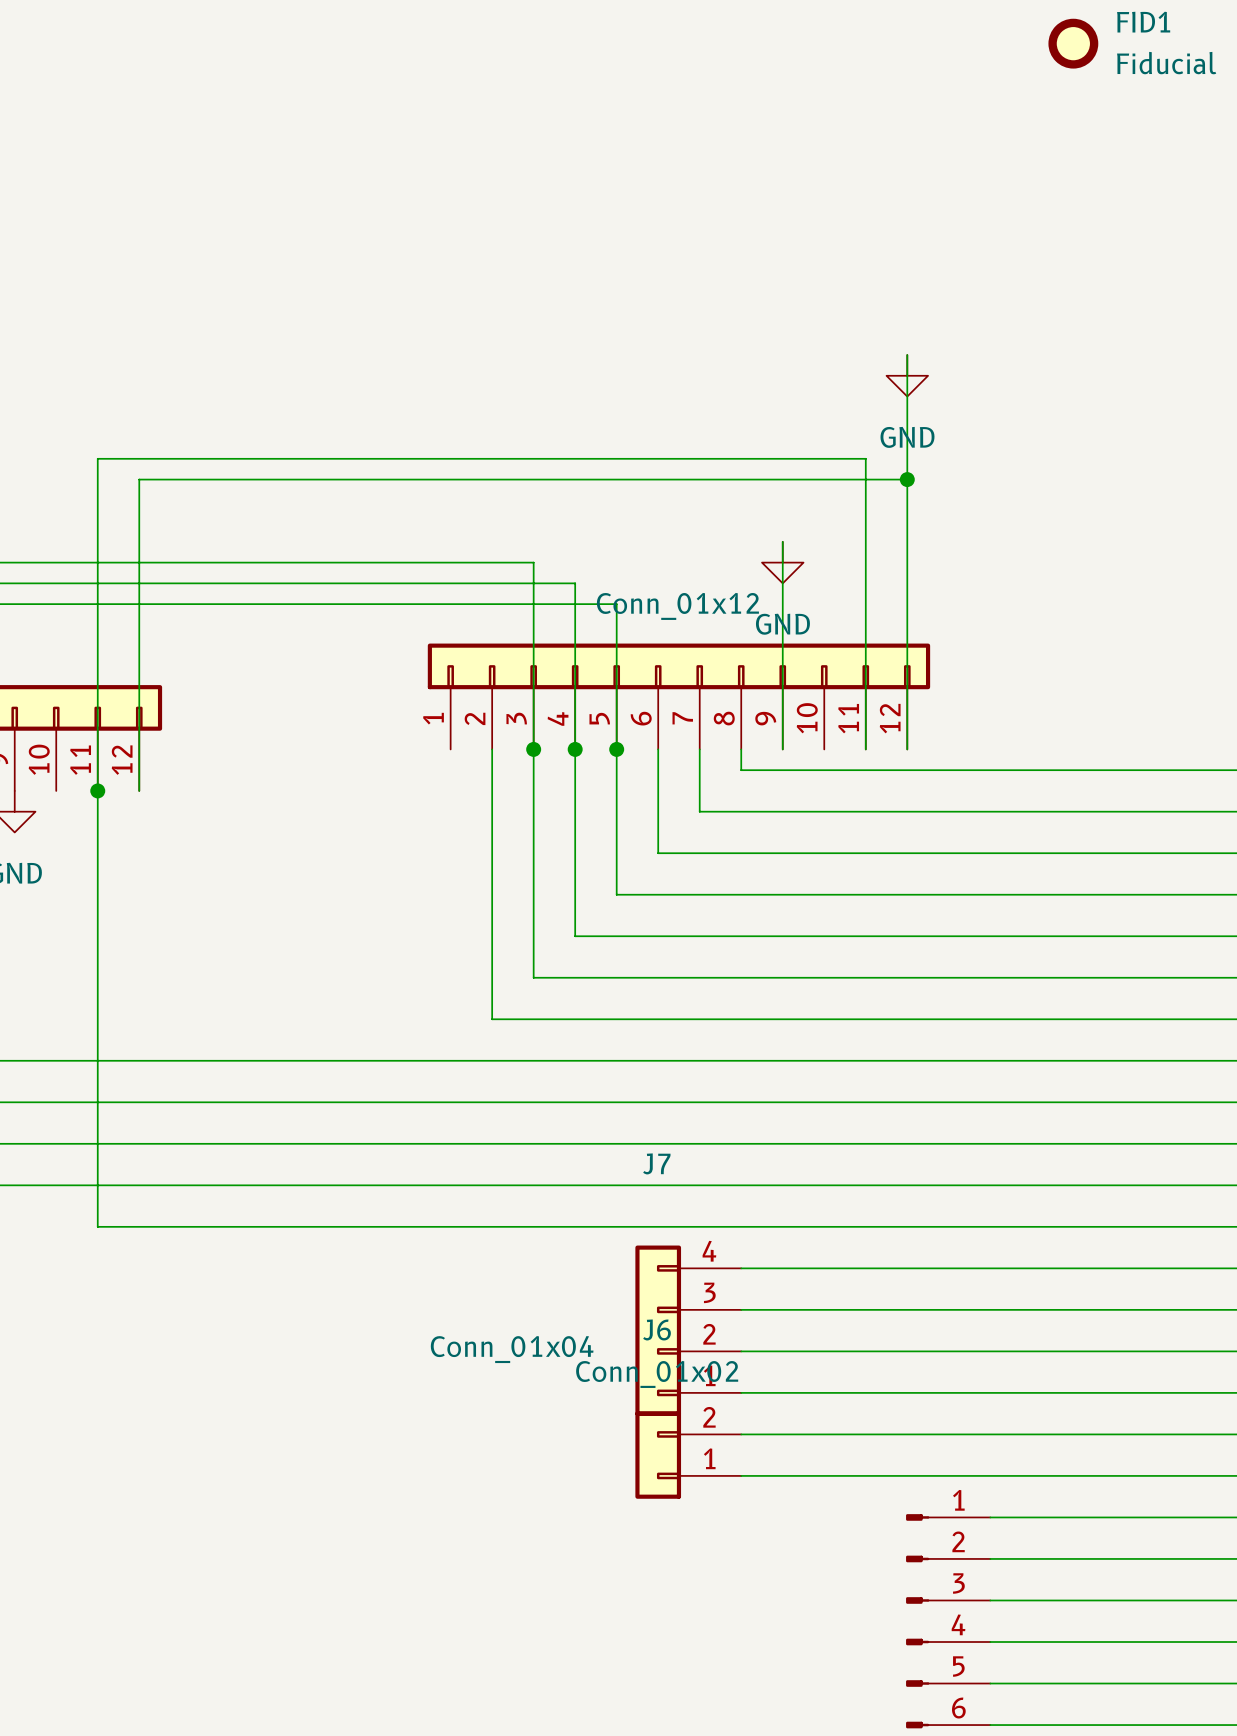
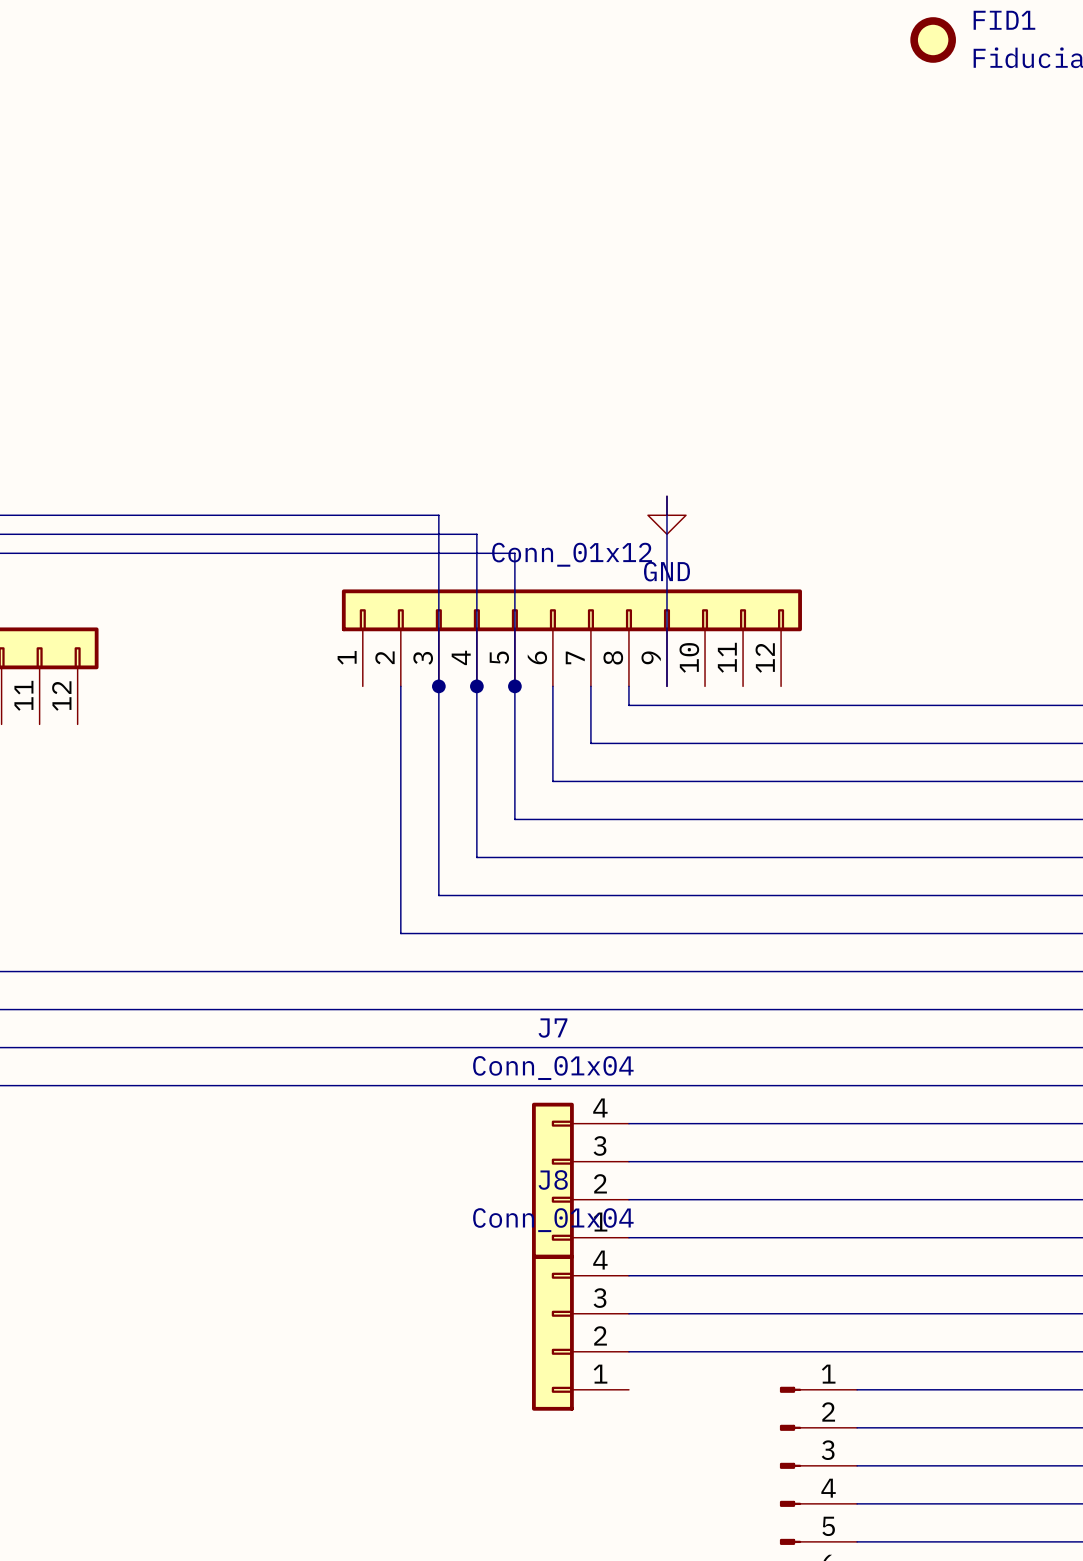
wire: (907, 355) (907, 749) -> none
power symbol: GND (907, 375) -> none
wire: (907, 479) (139, 479) (139, 790) -> none
junction: (907, 479) -> none
wire: (865, 749) (865, 458) (97, 458) (97, 1226) (741, 1226) -> none
junction: (97, 790) -> none
J7 position: (688, 1330) -> (580, 1180)
J7 value position: Conn_01x04 (512, 1349) -> Conn_01x04 (553, 1068)
J6: Conn_01x02 (688, 1455) -> none
J8: none -> Conn_01x04 (580, 1332)

